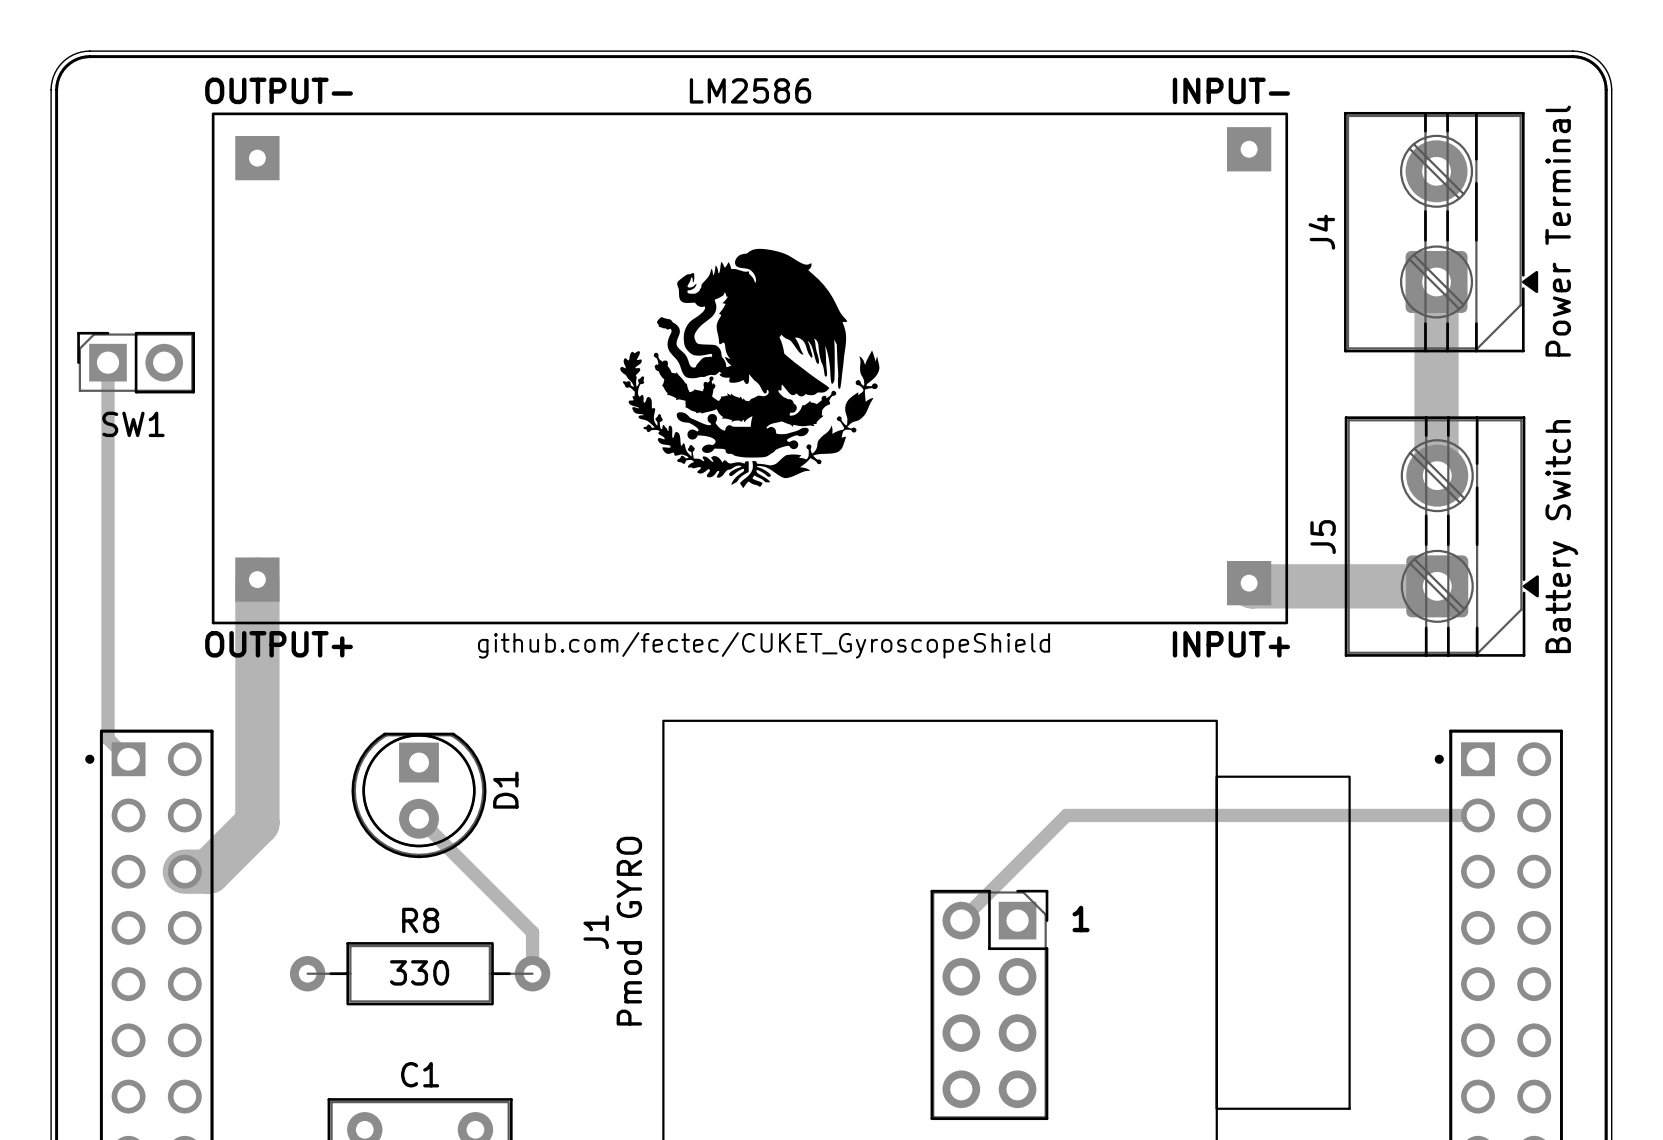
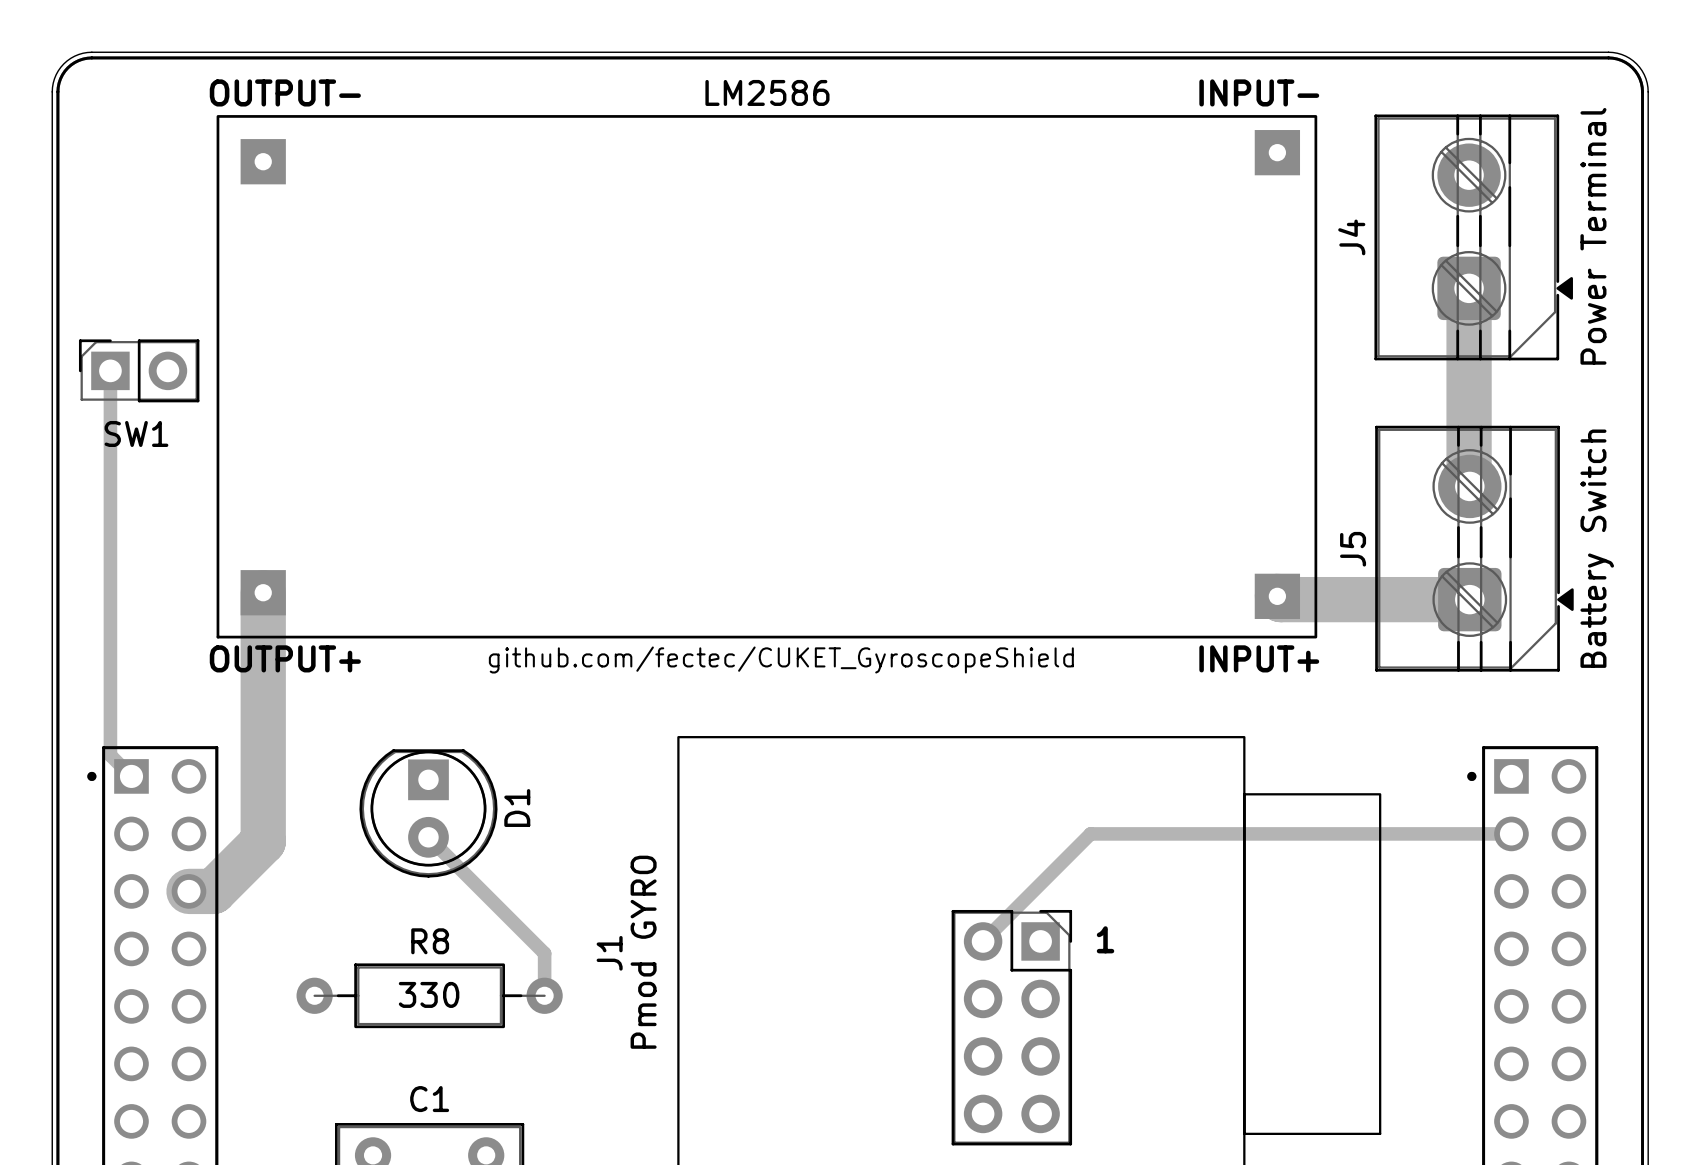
drawing: [620, 248, 880, 489] -> none

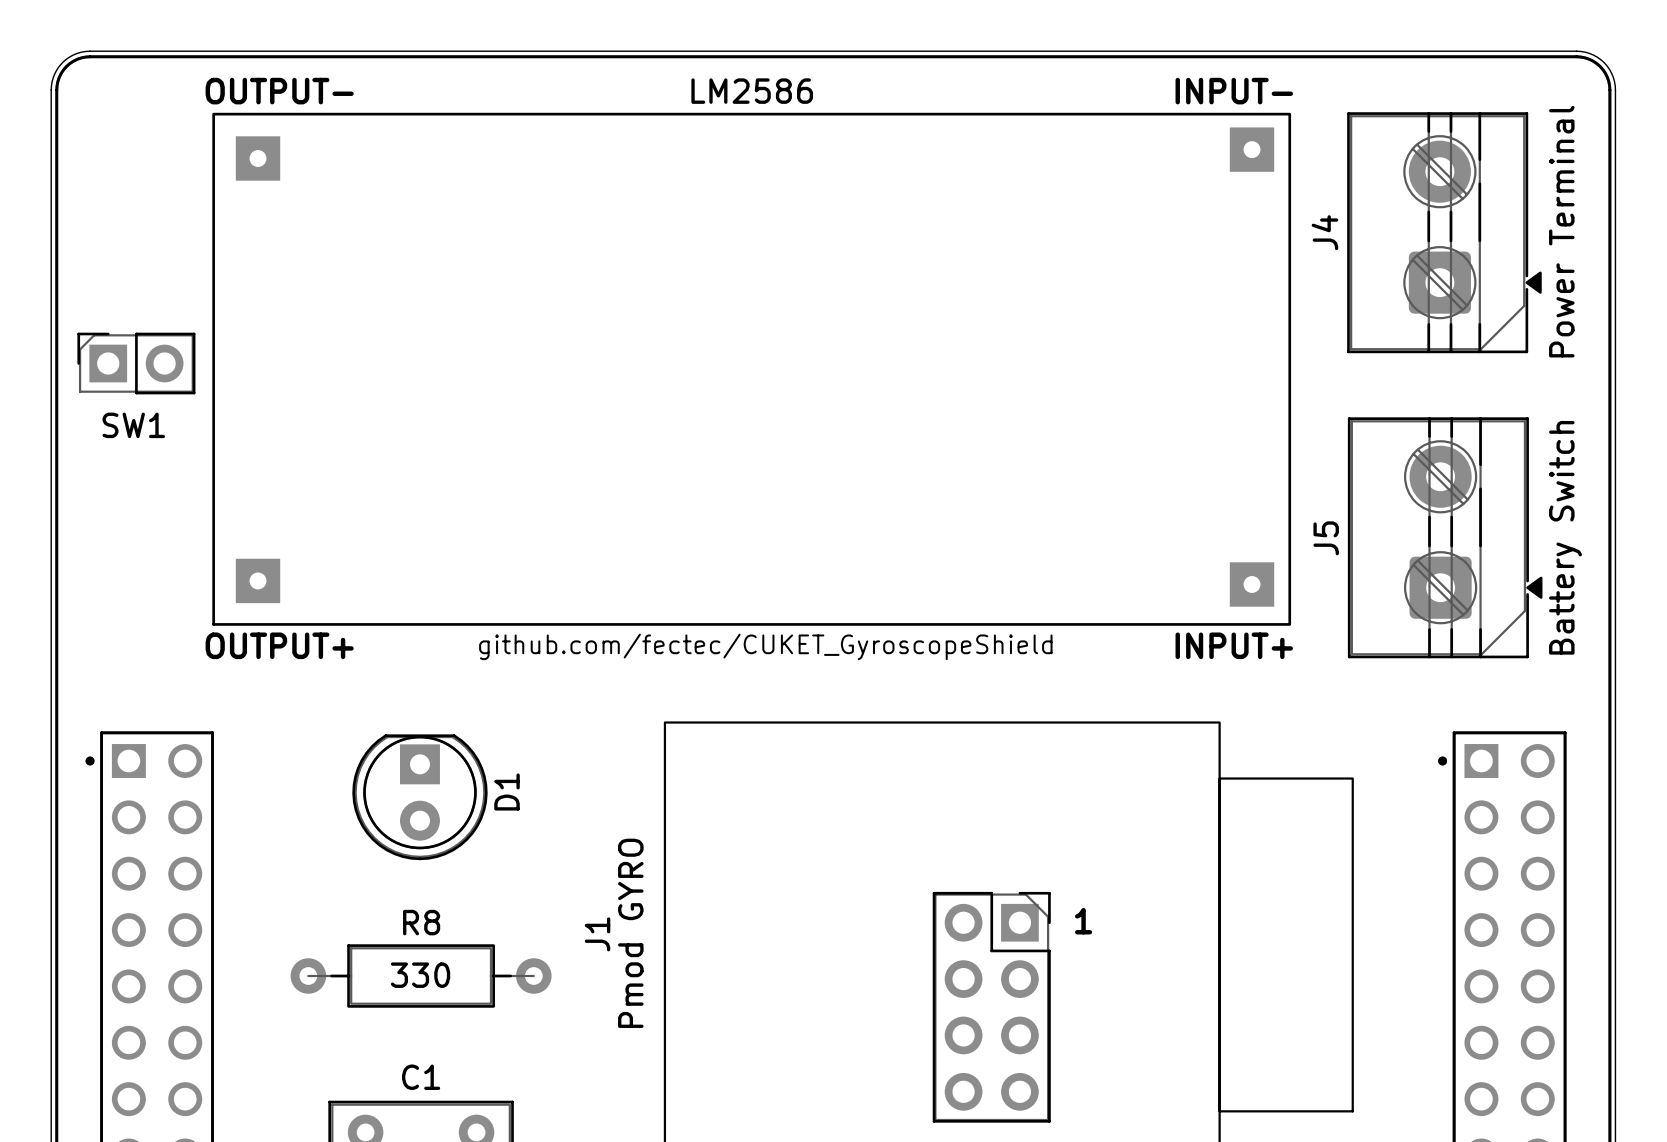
track: (1469, 288) (1469, 485) -> none
track: (110, 370) (110, 755) (131, 776) -> none
track: (263, 592) (263, 841) (213, 891) (188, 891) -> none
track: (1277, 596) (1280, 599) (1469, 599) -> none
track: (1511, 833) (1090, 833) (983, 941) -> none
track: (428, 837) (544, 953) (544, 995) -> none

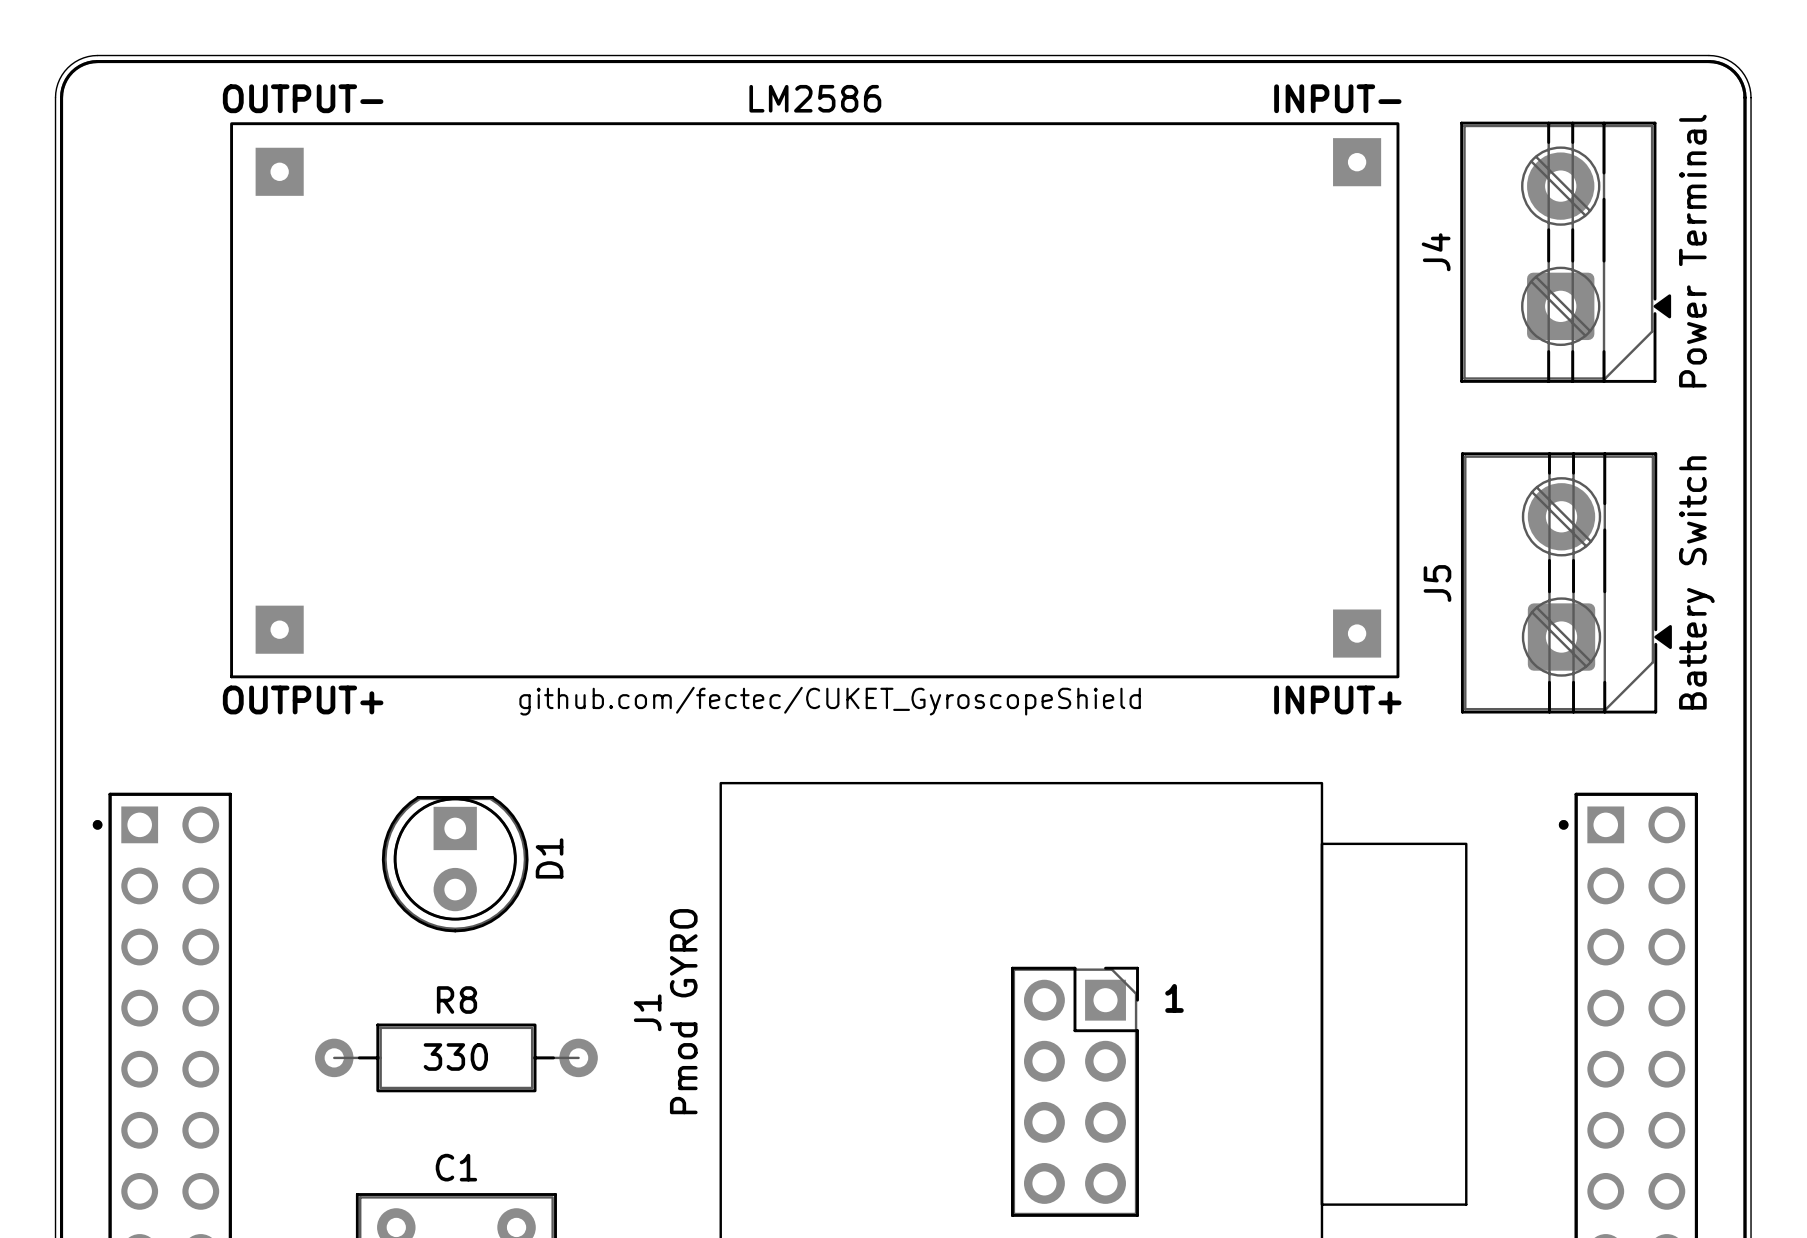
SW1: (136, 363) -> none

